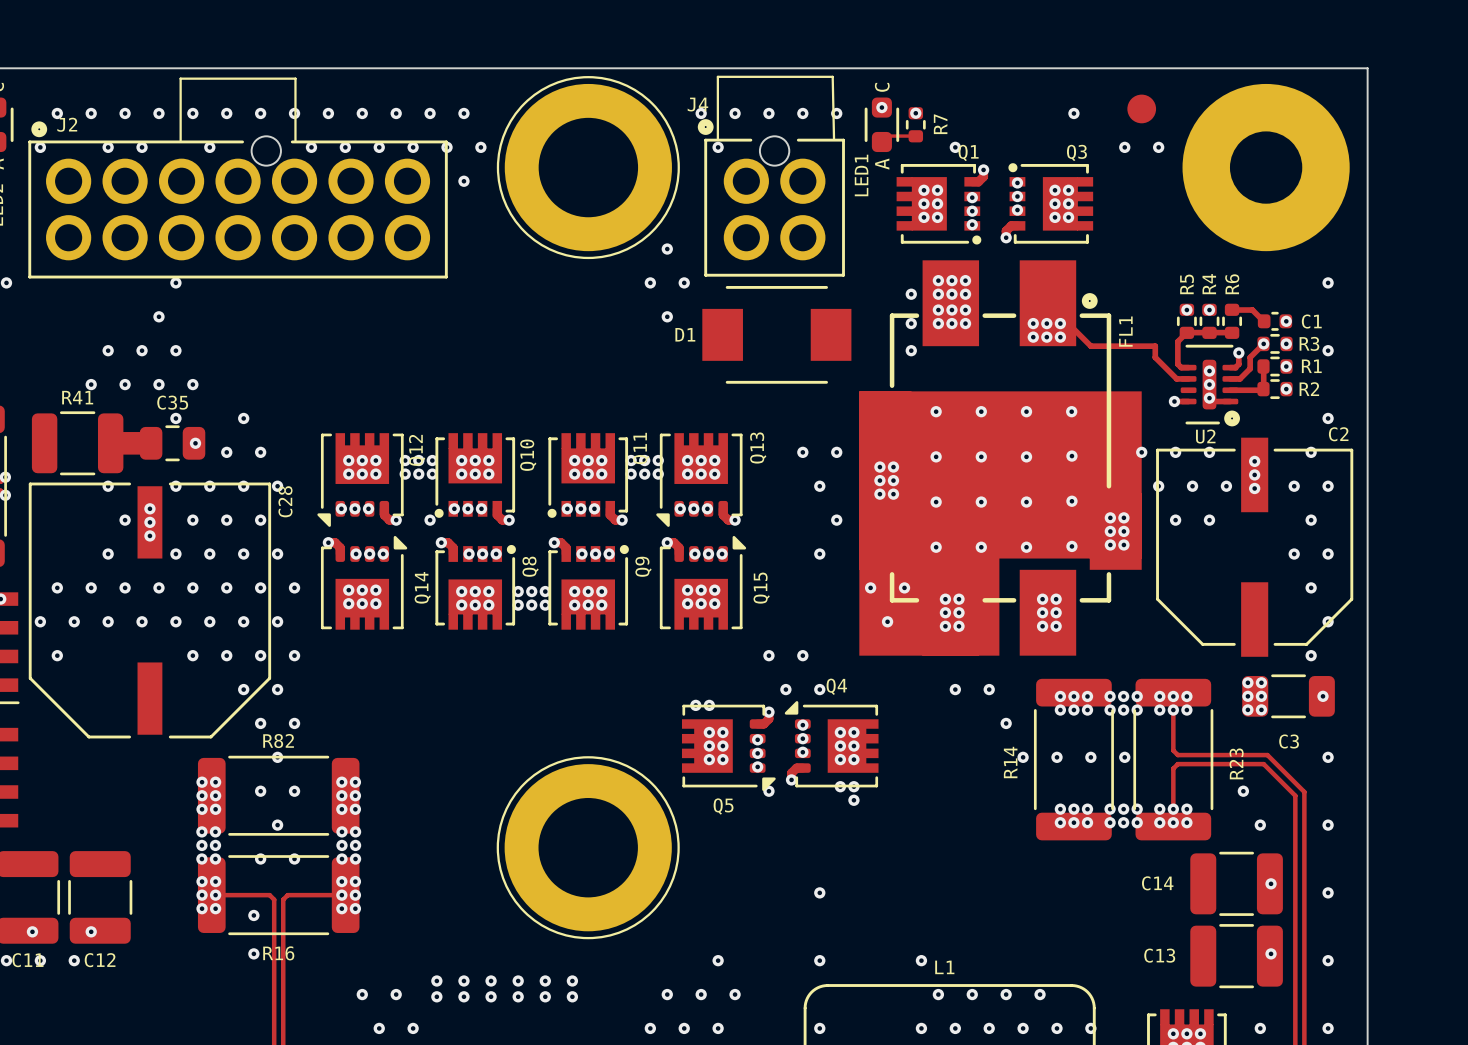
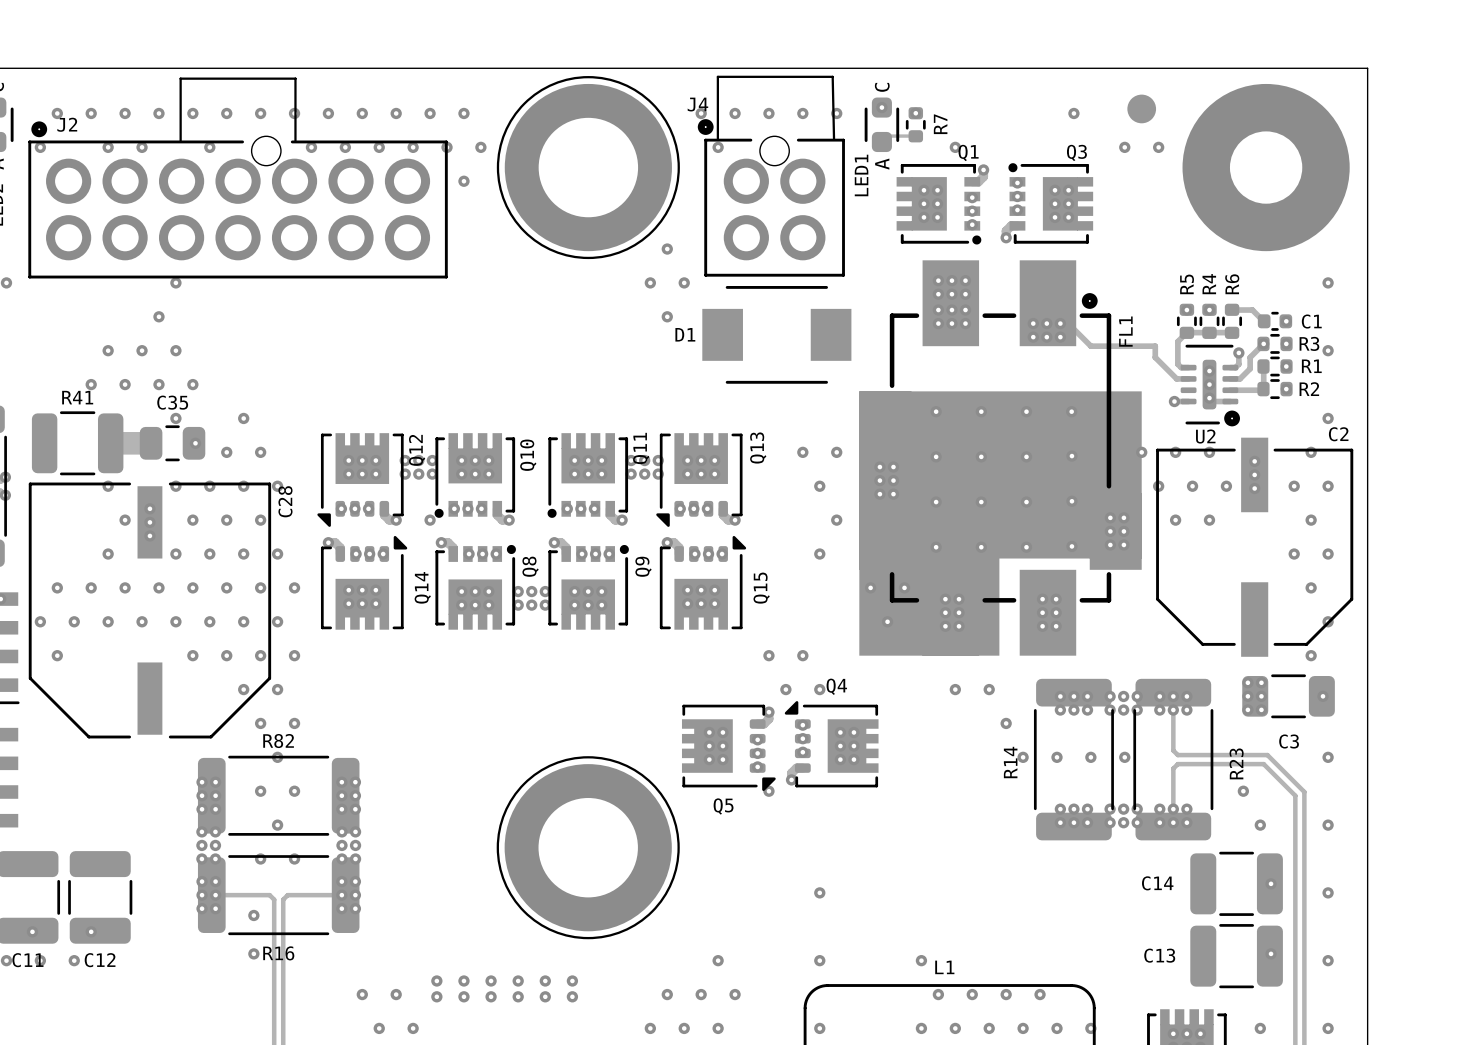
via: (911, 294) -> none
via: (911, 323) -> none
via: (911, 350) -> none
via: (695, 705) -> none
via: (709, 705) -> none
via: (840, 786) -> none
via: (853, 786) -> none
via: (853, 800) -> none

